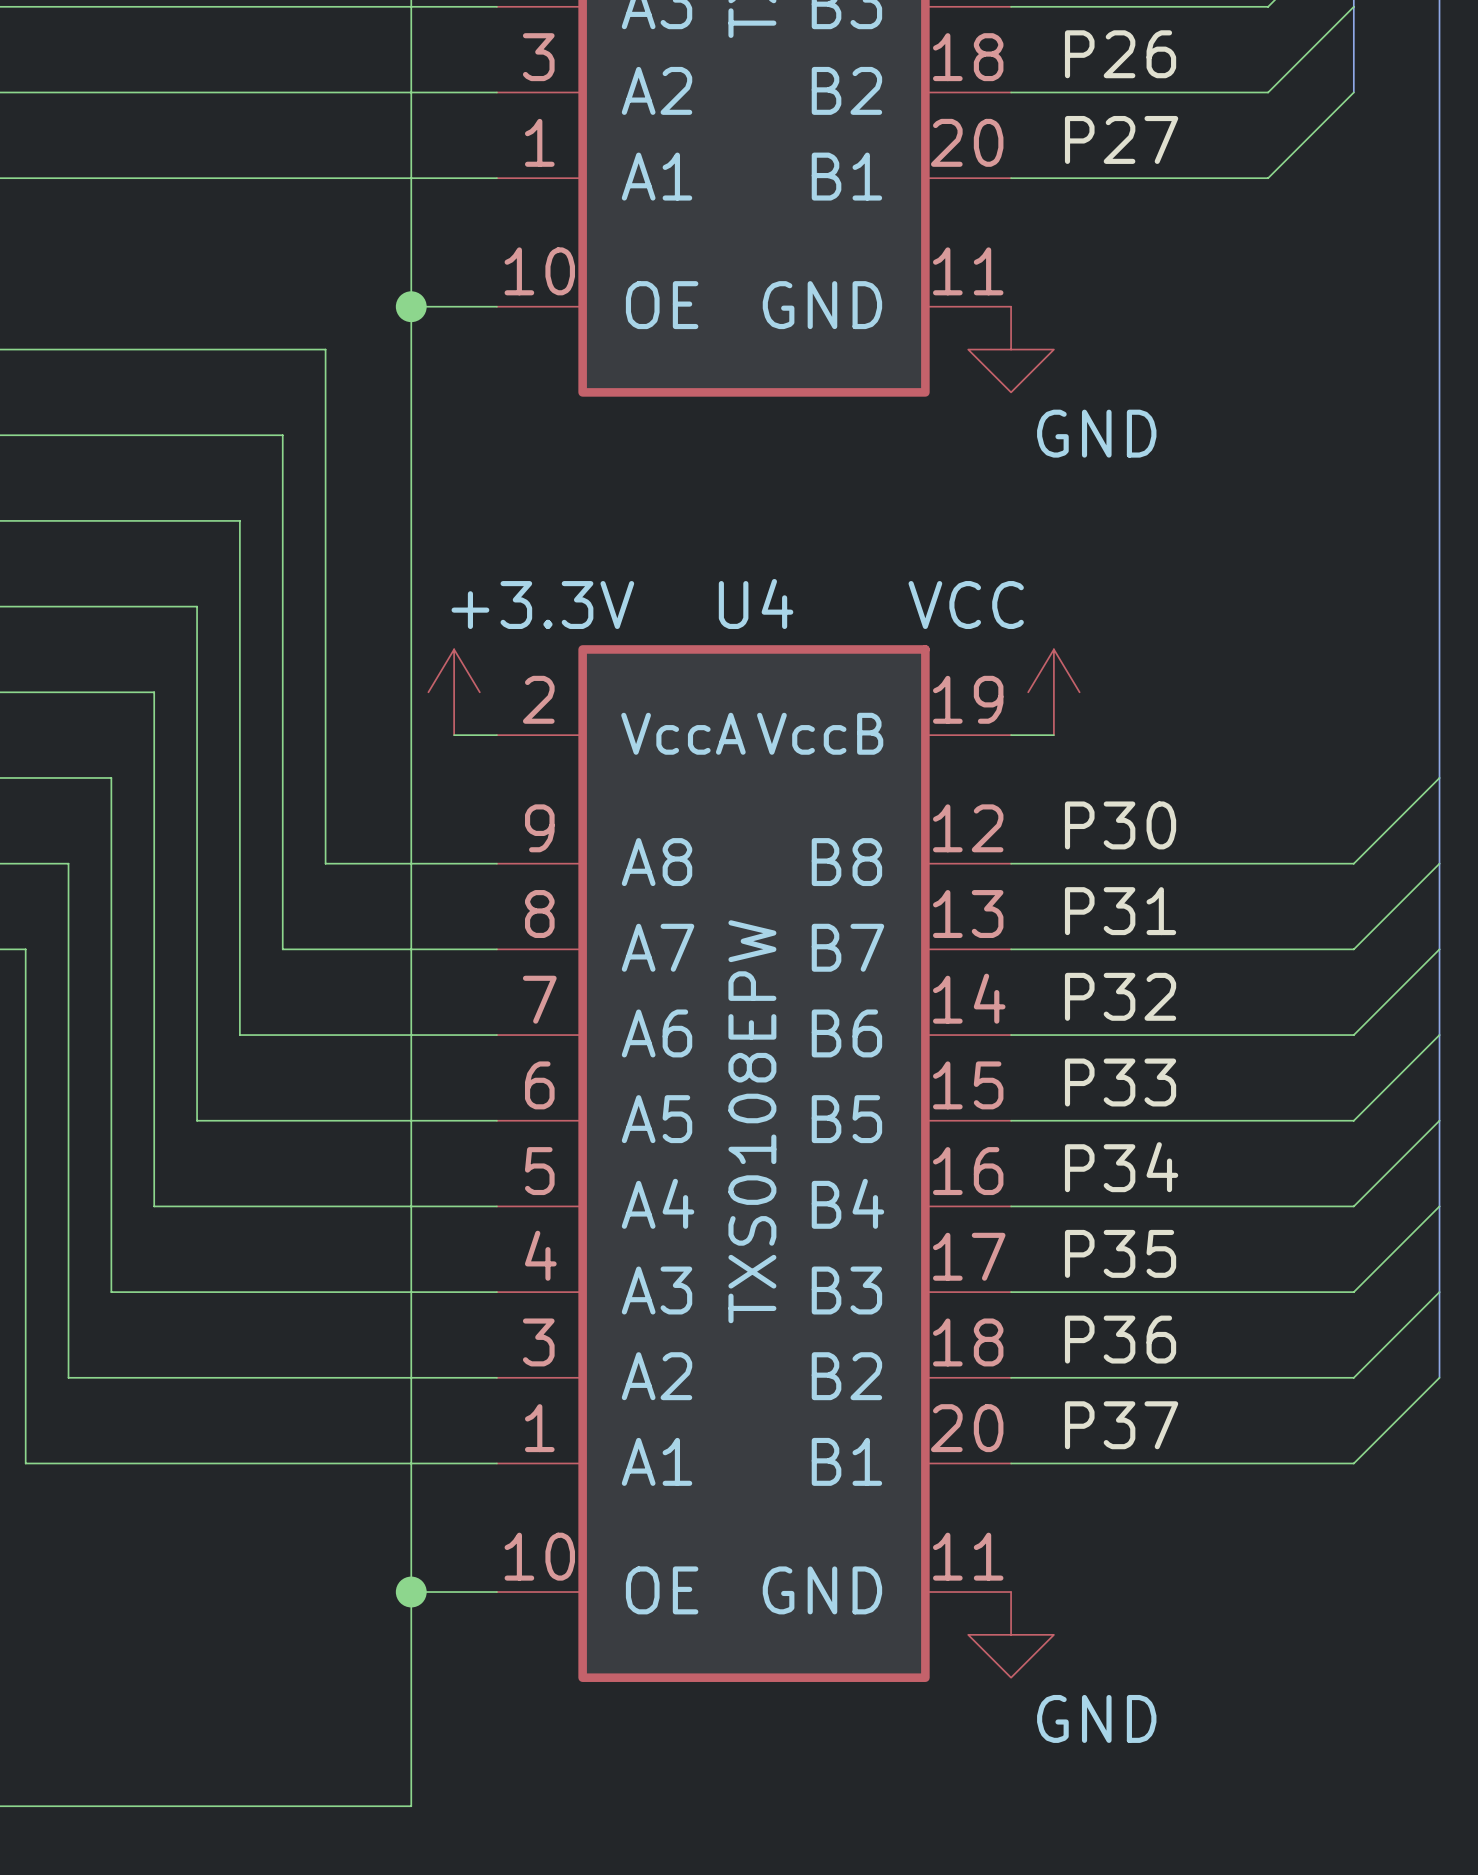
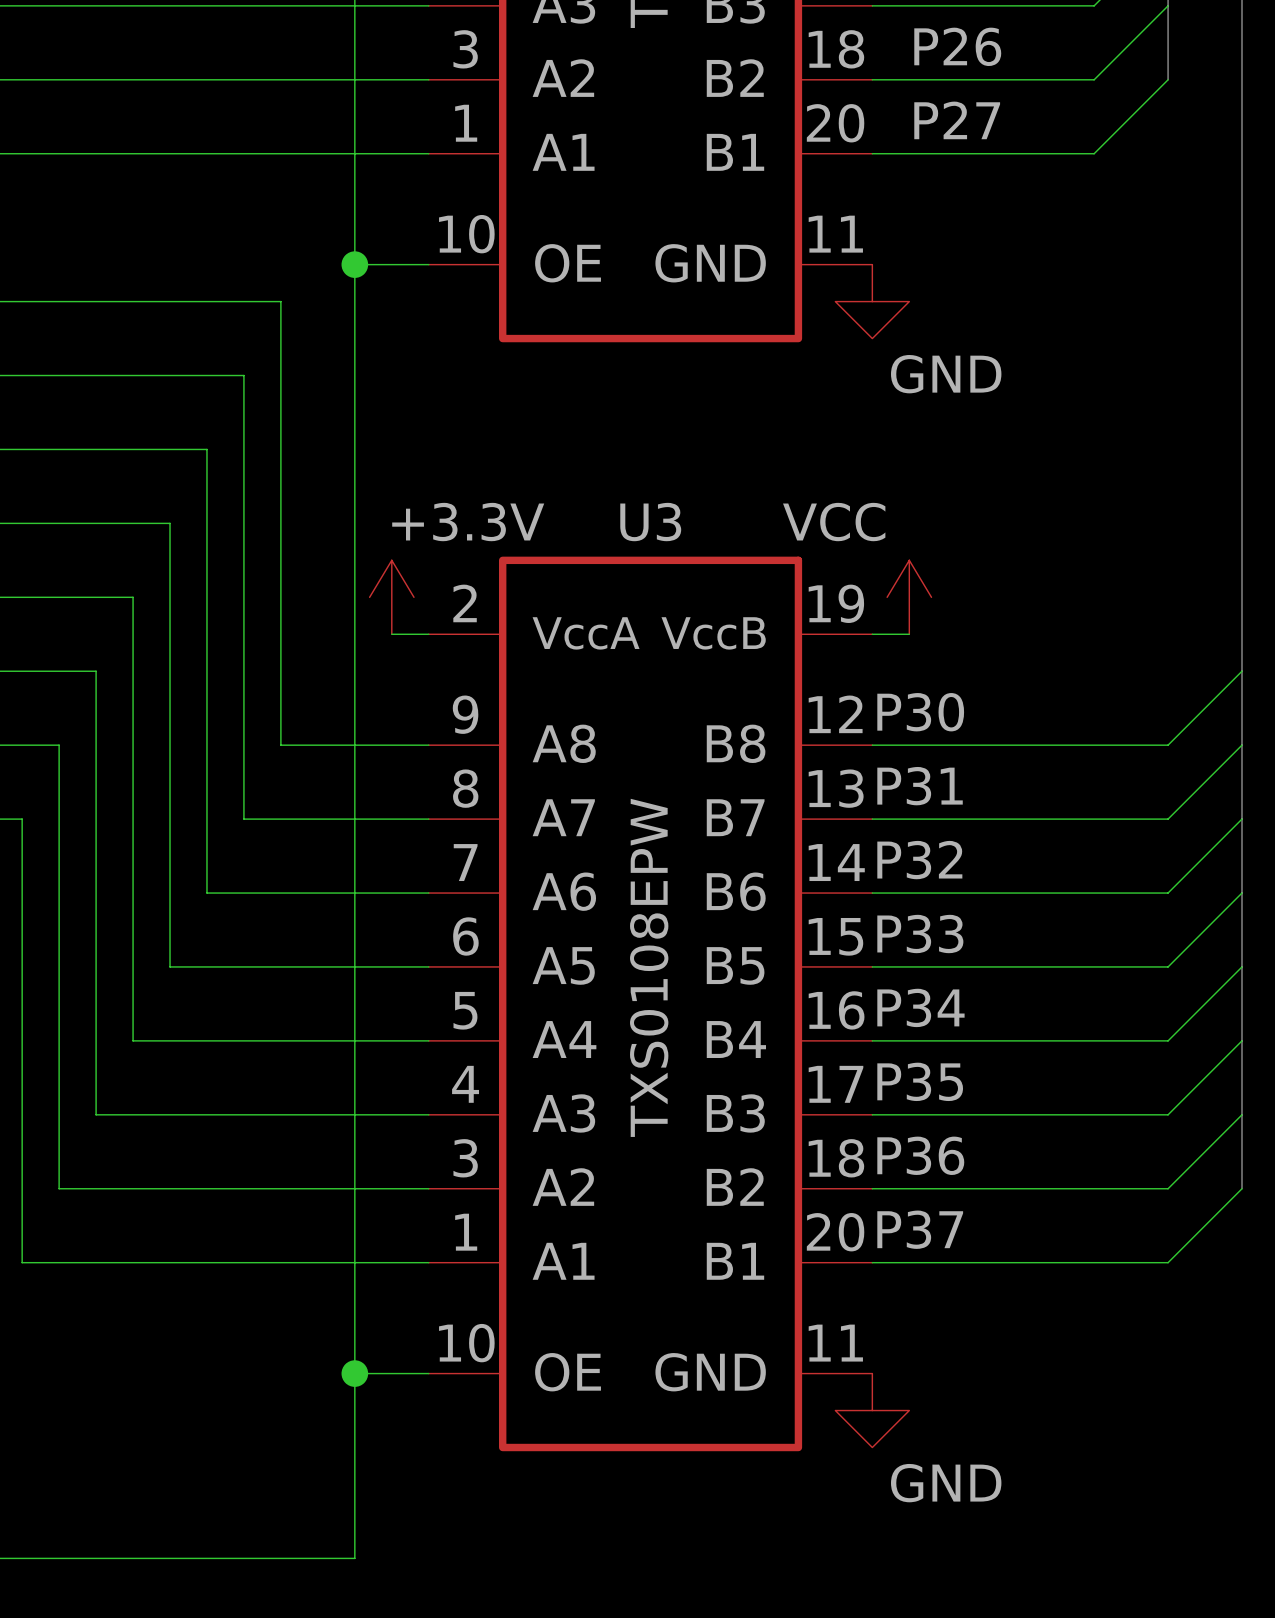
U4 name: U4 (756, 603) -> U3 (650, 522)
label position: P30 (1120, 825) -> P30 (920, 712)
label position: P31 (1120, 911) -> P31 (920, 786)
label position: P32 (1120, 996) -> P32 (919, 860)
label position: P33 (1120, 1082) -> P33 (920, 934)
label position: P34 (1121, 1167) -> P34 (920, 1007)
label position: P35 (1120, 1253) -> P35 (920, 1081)
label position: P36 (1120, 1339) -> P36 (920, 1155)
label position: P37 (1121, 1425) -> P37 (920, 1229)

